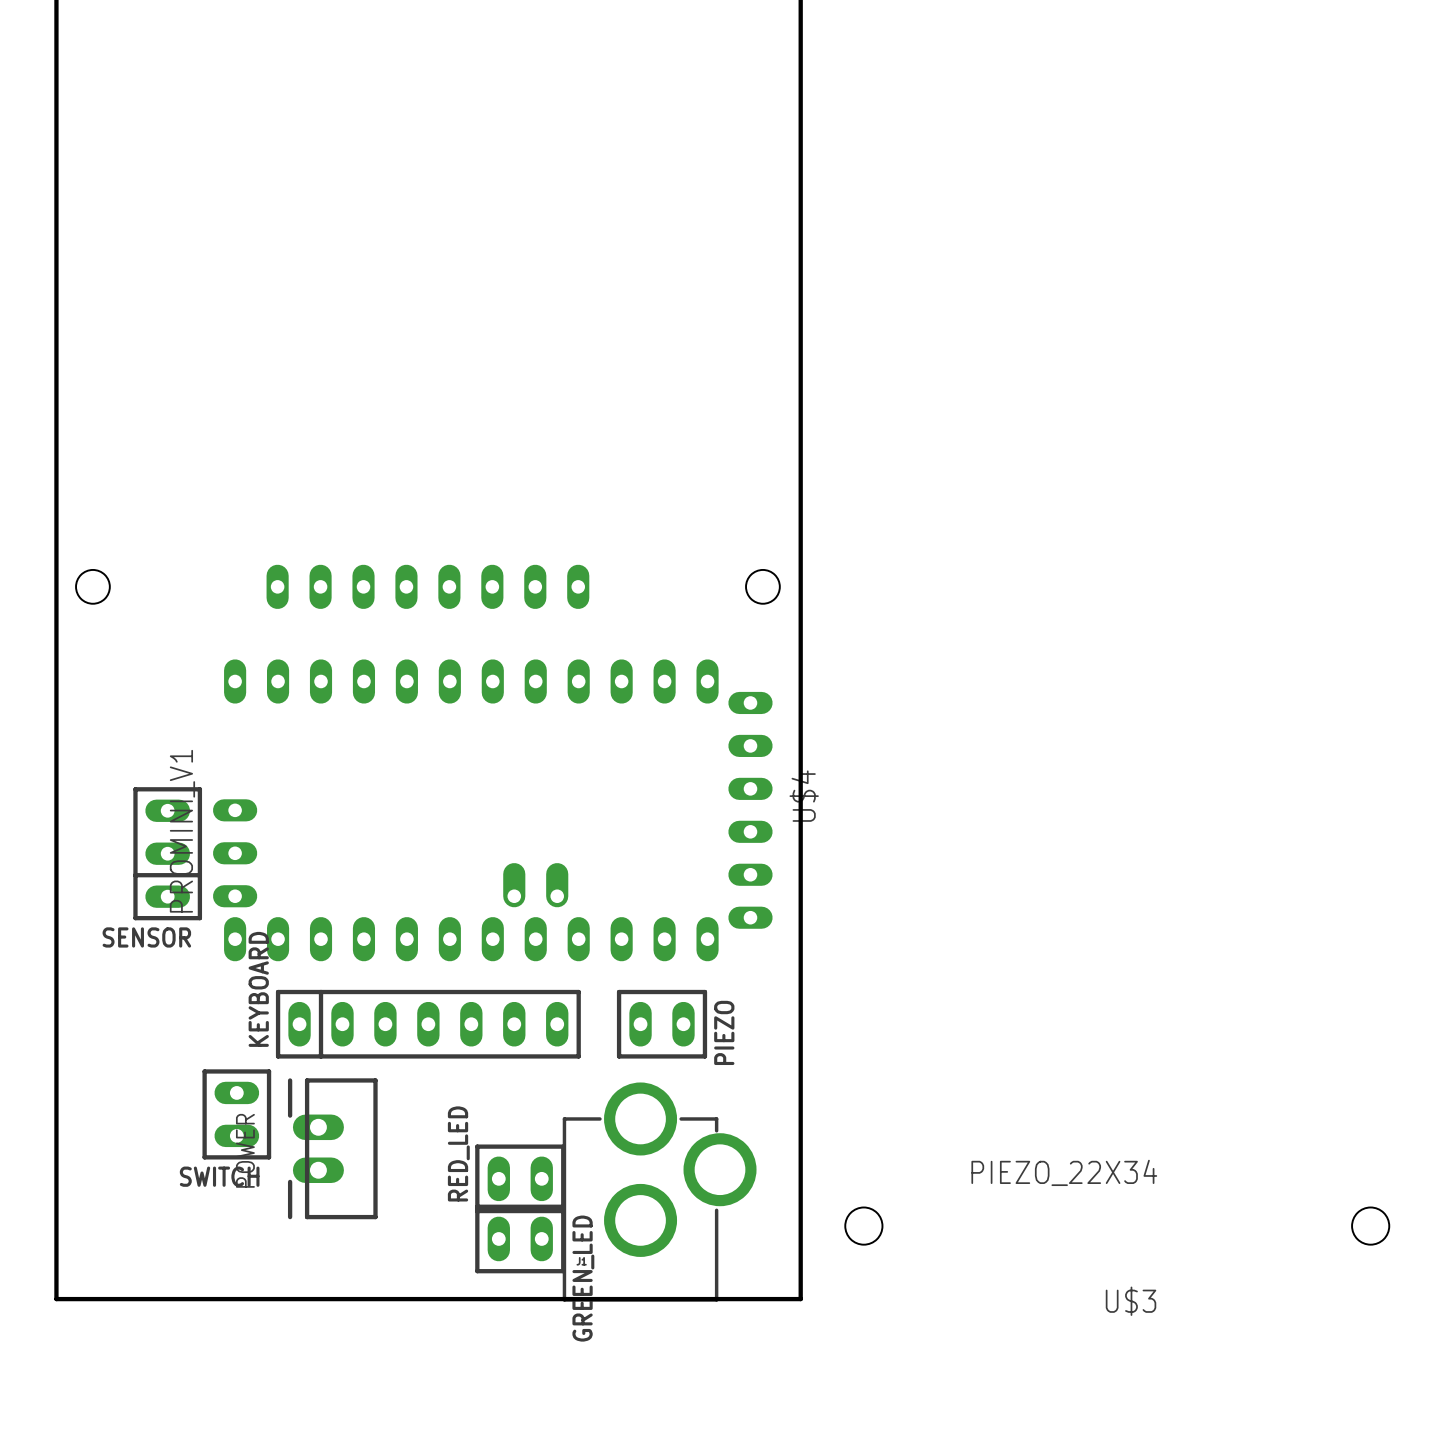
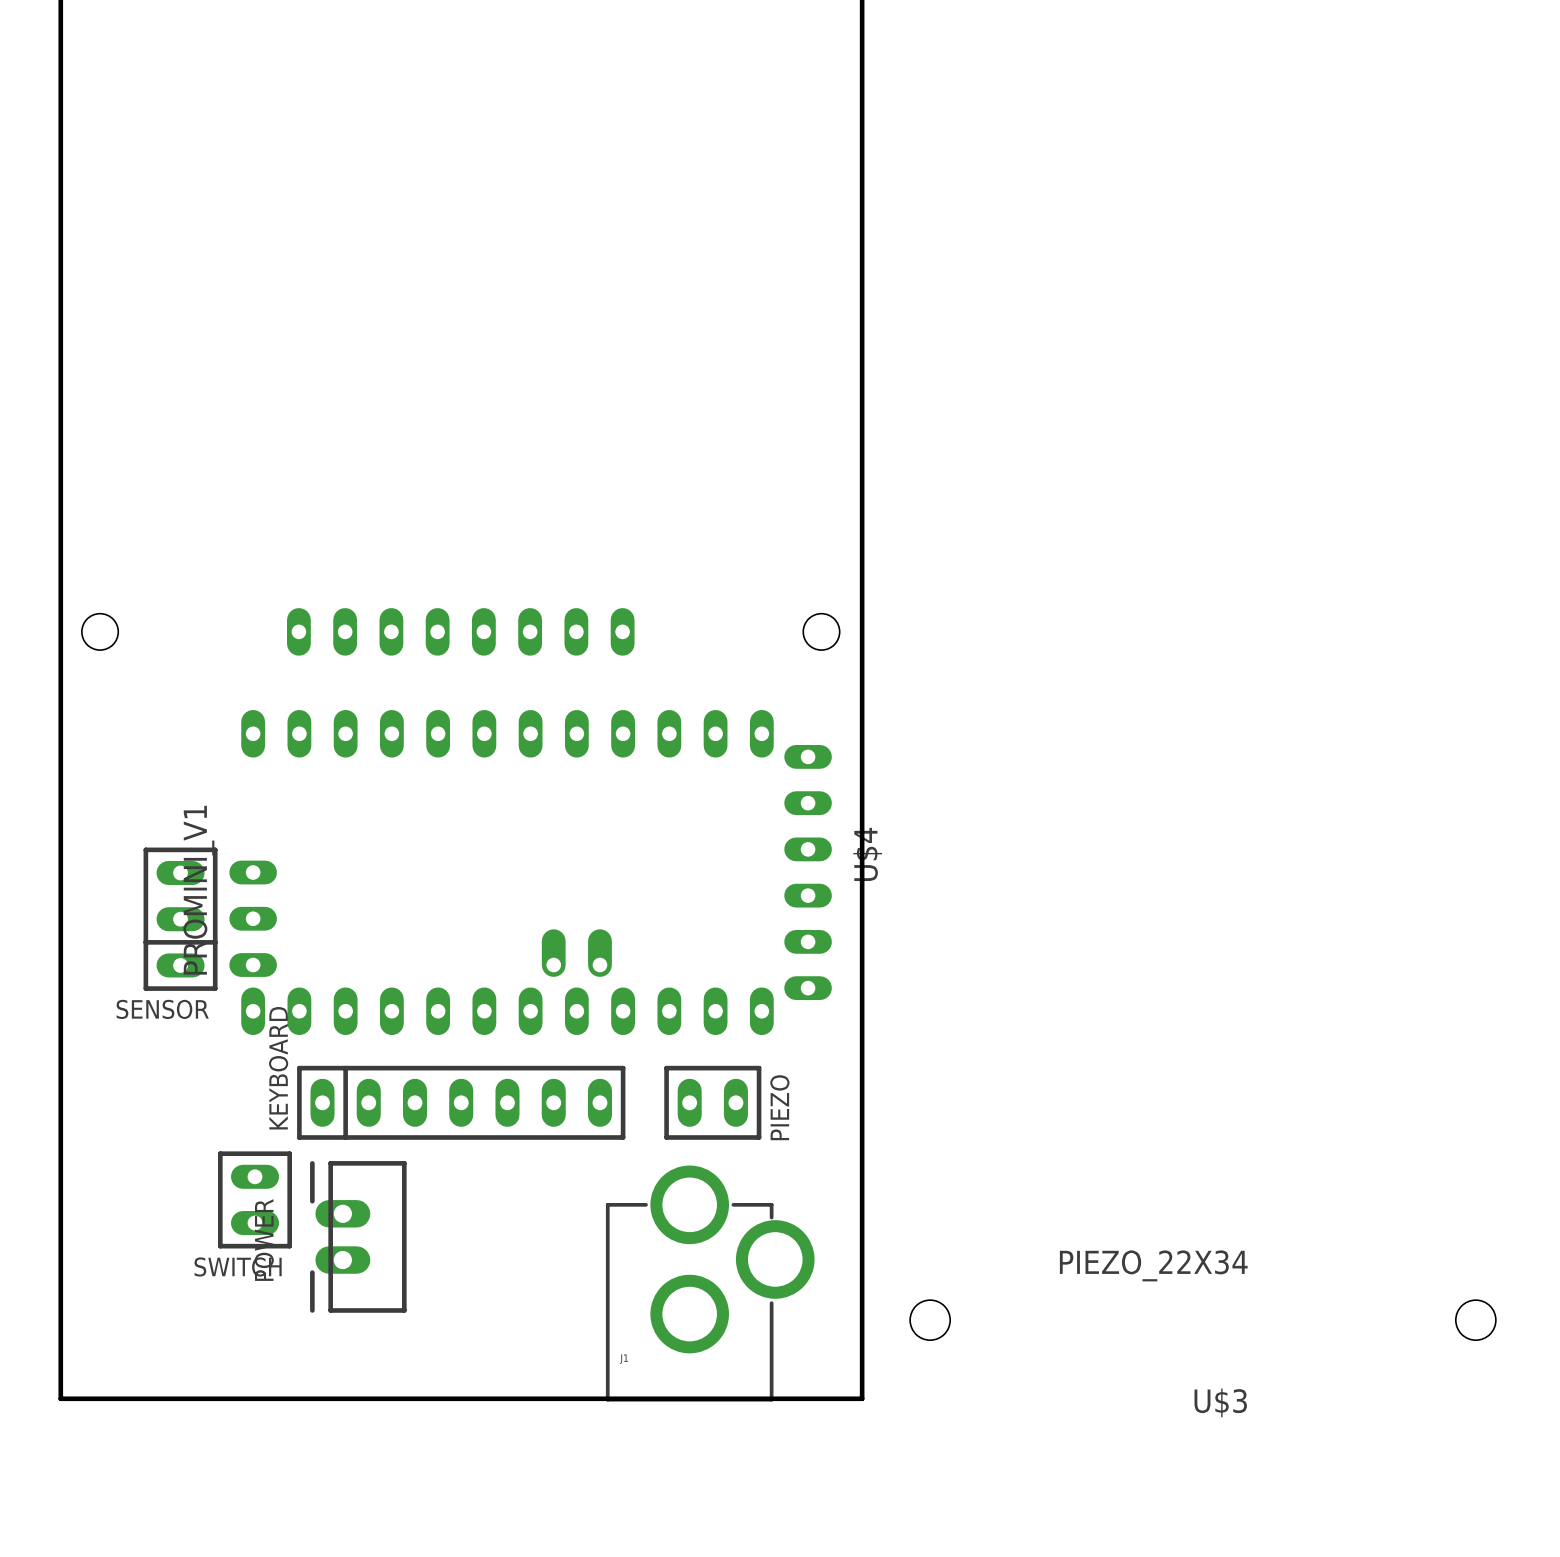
RED_LED: (520, 1178) -> none
GREEN_LED: (520, 1238) -> none

